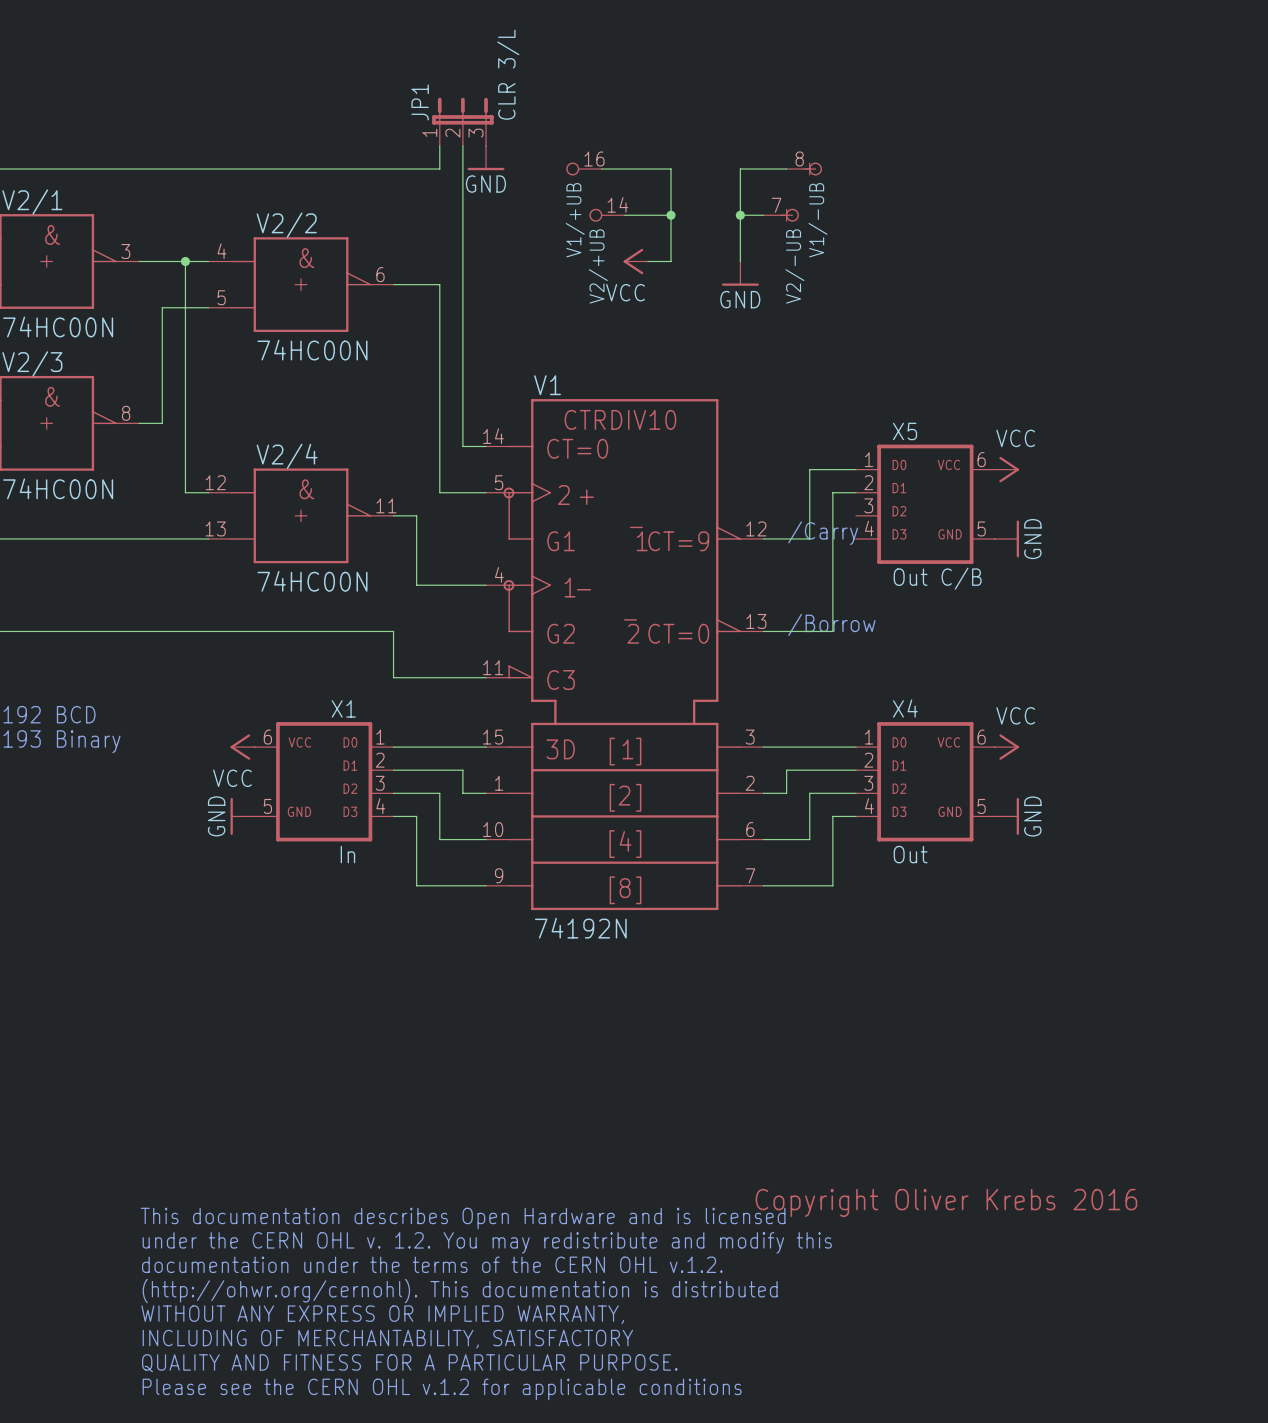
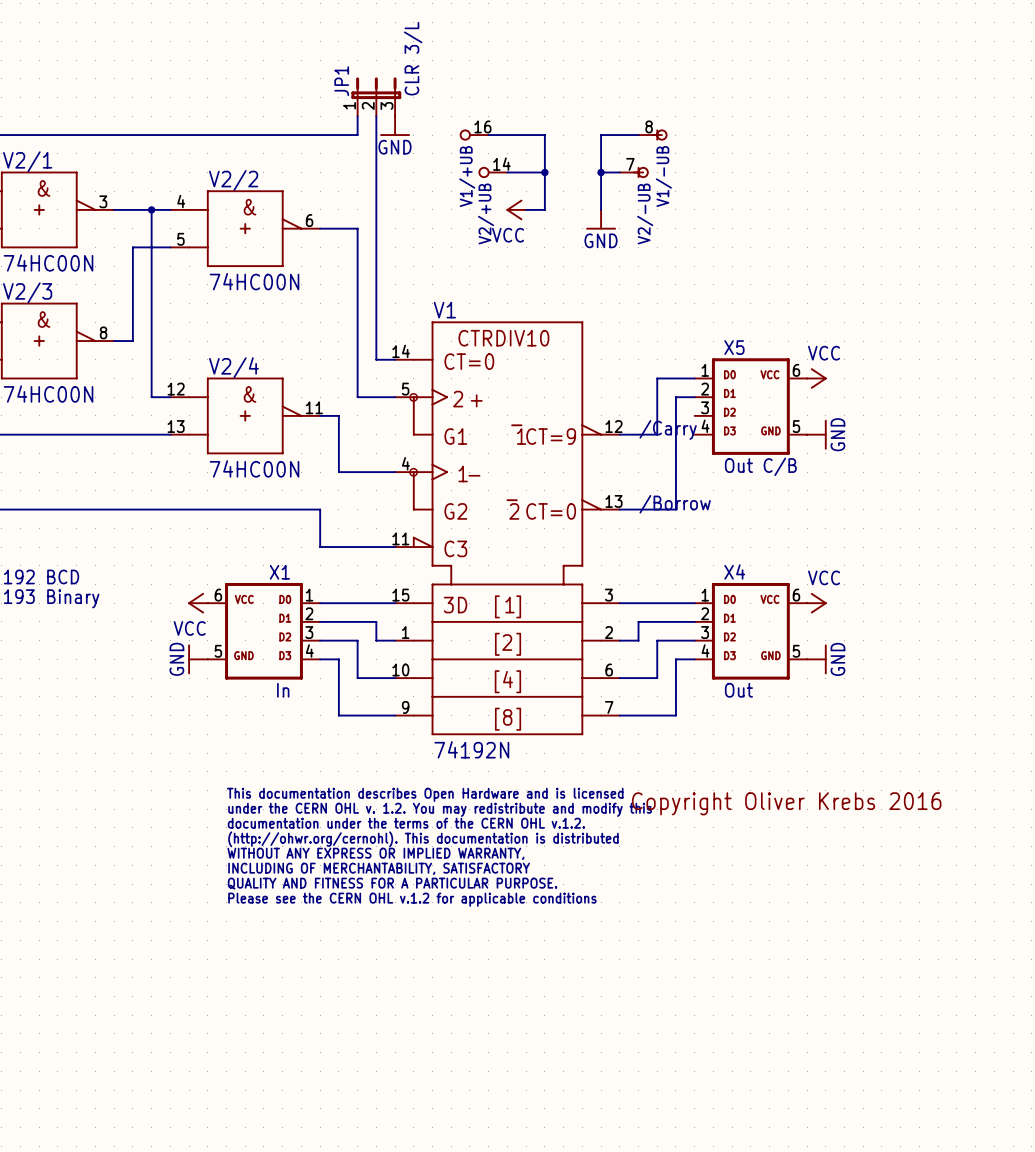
text: none -> This documentation describes Open Hardware and is licensed (425, 794)
text: none -> under the CERN OHL v. 1.2. You may redistribute and modify this (440, 809)
text: none -> documentation under the terms of the CERN OHL v.1.2. (406, 823)
text: none -> (http://ohwr.org/cernohl). This documentation is distributed (423, 839)
text: none -> WITHOUT ANY EXPRESS OR IMPLIED WARRANTY, (375, 853)
text: none -> INCLUDING OF MERCHANTABILITY, SATISFACTORY (379, 868)
text: none -> QUALITY AND FITNESS FOR A PARTICULAR PURPOSE. (392, 883)
text: none -> Please see the CERN OHL v.1.2 for applicable conditions (412, 899)
text position: Copyright Oliver Krebs 2016 (946, 1202) -> Copyright Oliver Krebs 2016 (786, 803)
text: This documentation describes Open Hardware and is licensed (463, 1218) -> none
text: under the CERN OHL v. 1.2. You may redistribute and modify this (487, 1242) -> none
text: documentation under the terms of the CERN OHL v.1.2. (432, 1264) -> none
text: (http://ohwr.org/cernohl). This documentation is distributed (460, 1291) -> none
text: WITHOUT ANY EXPRESS OR IMPLIED WARRANTY, (382, 1314) -> none
text: INCLUDING OF MERCHANTABILITY, SATISFACTORY (387, 1339) -> none
text: QUALITY AND FITNESS FOR A PARTICULAR PURPOSE. (409, 1363) -> none
text: Please see the CERN OHL v.1.2 for applicable conditions (442, 1389) -> none

